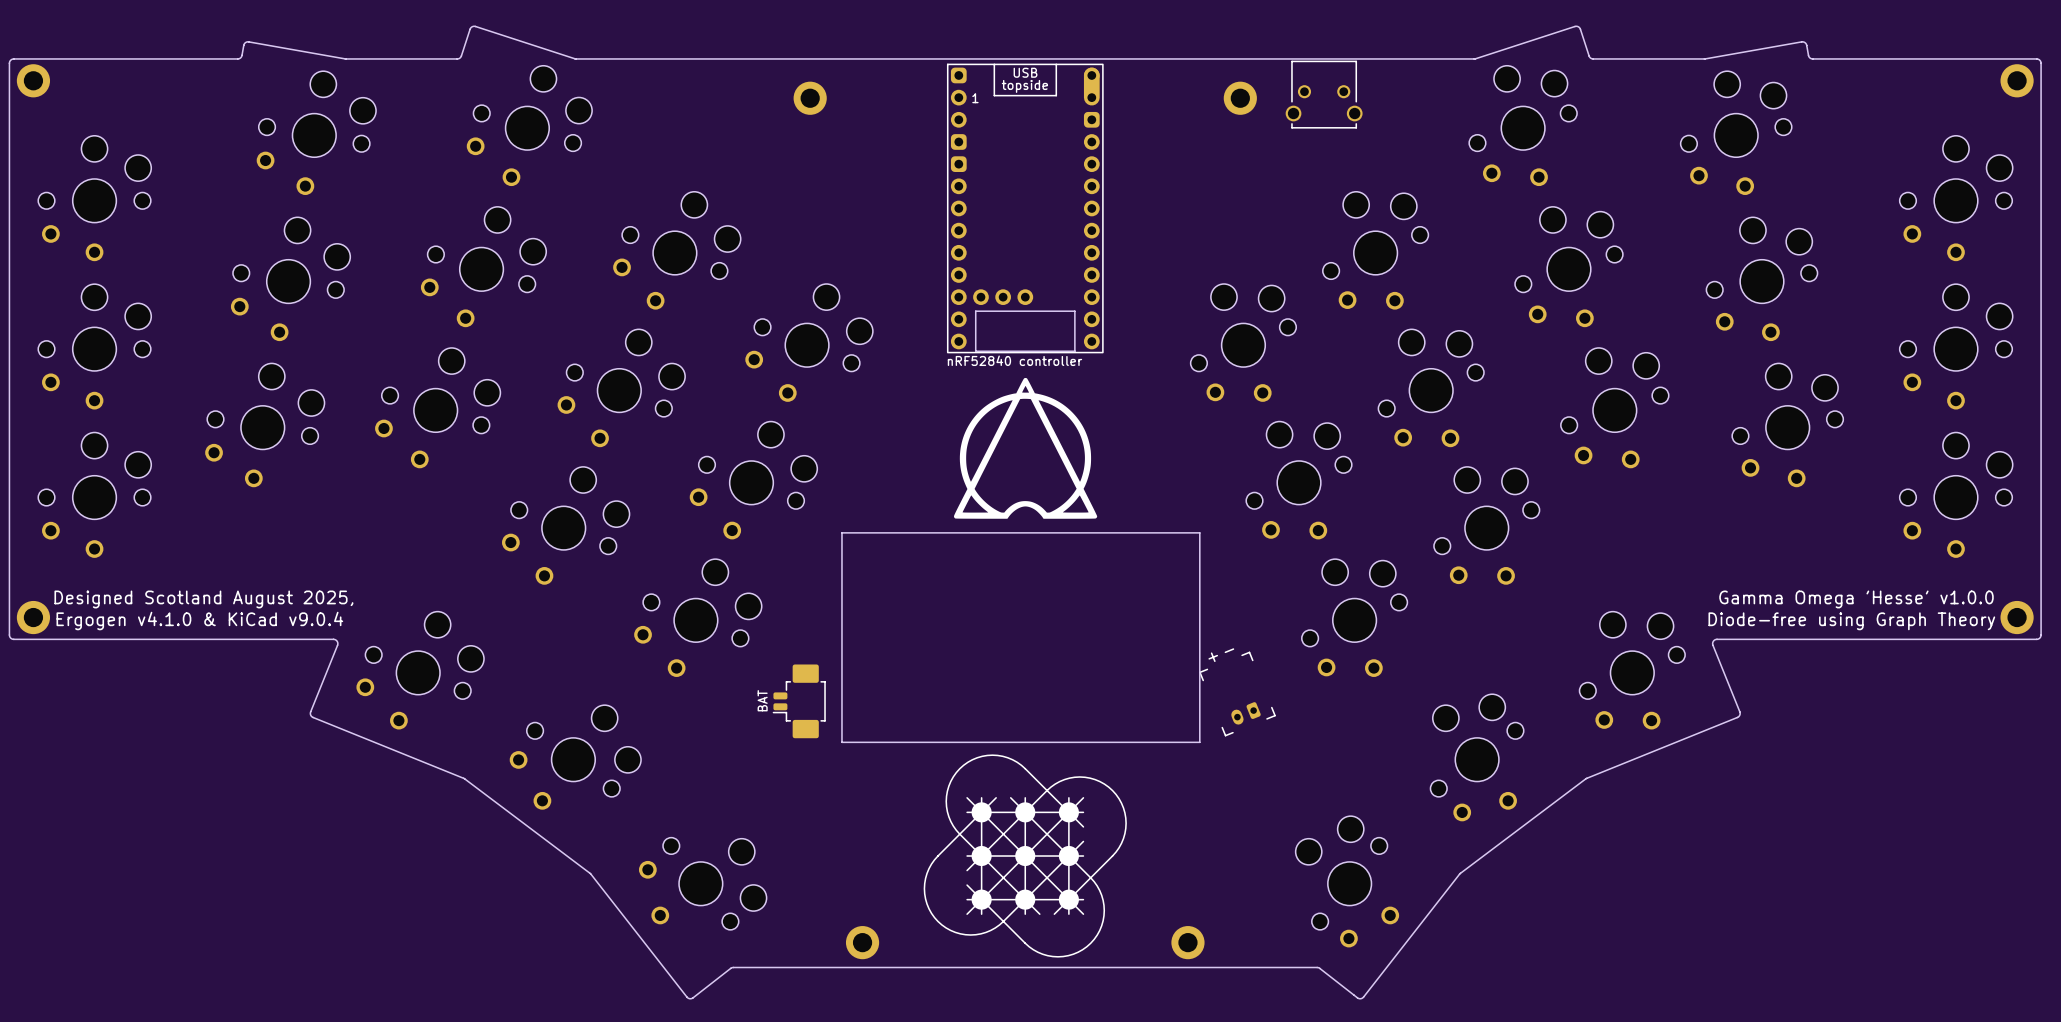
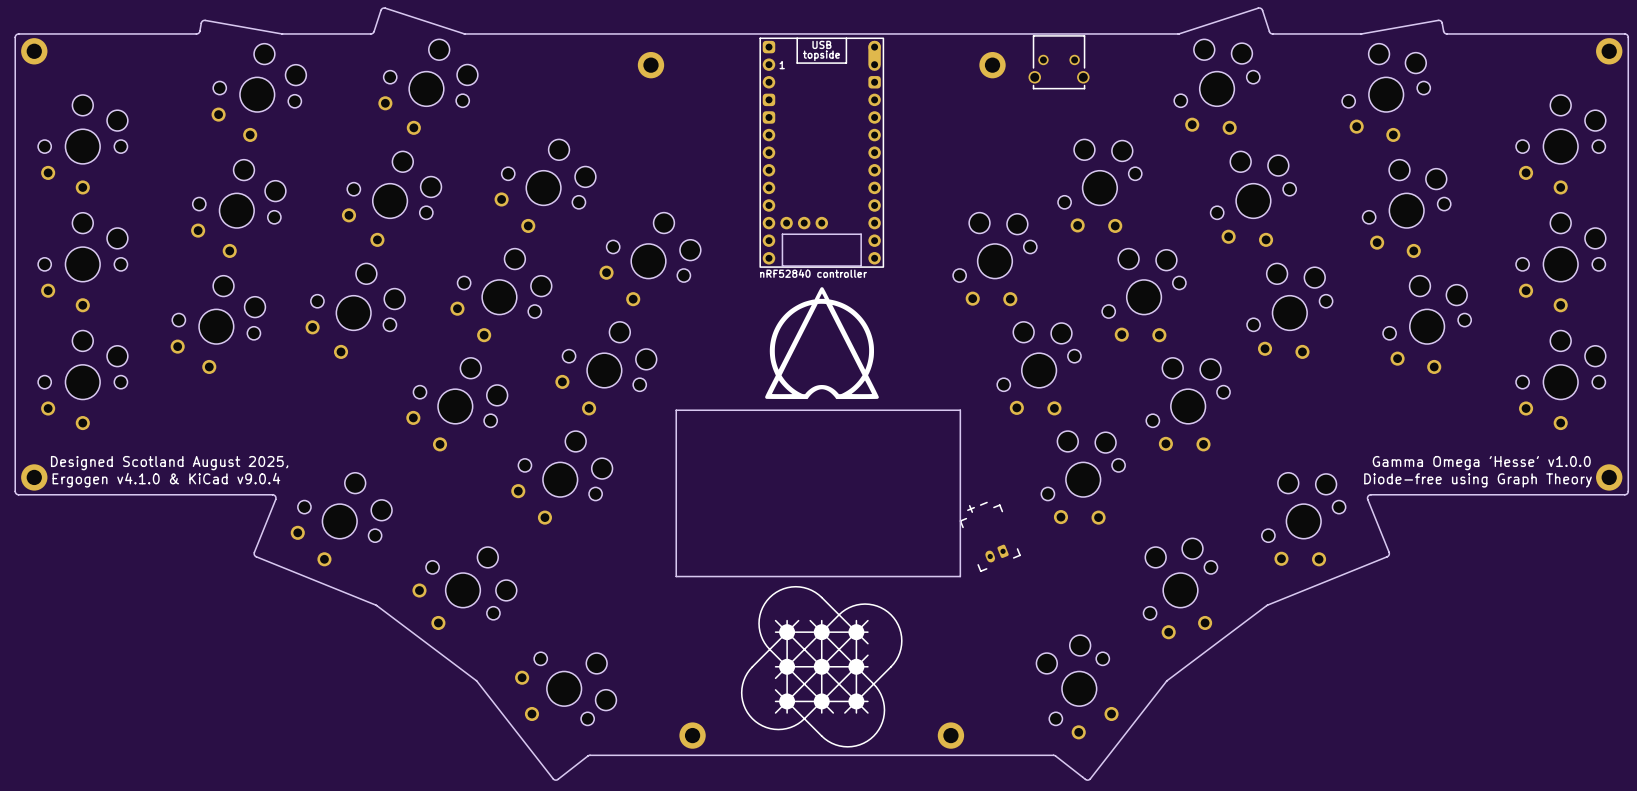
BAT: (799, 701) -> none

